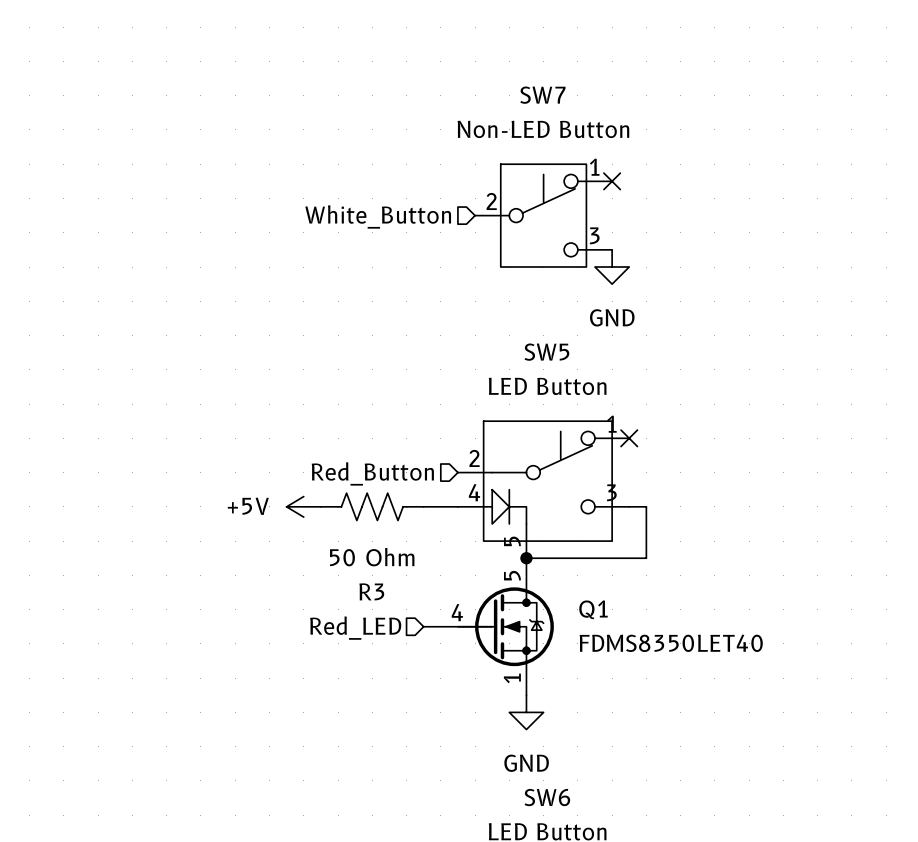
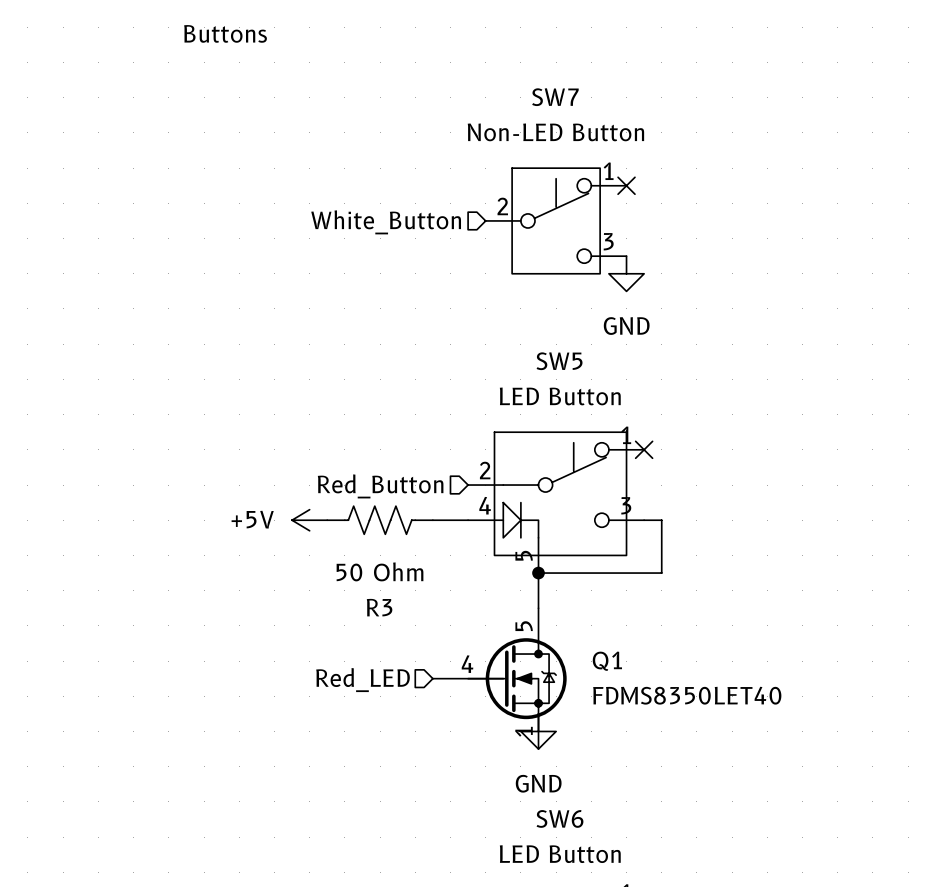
text: none -> Buttons (225, 33)
Q1 position: (488, 626) -> (499, 678)
hierarchical label position: Red_LED (355, 628) -> Red_LED (363, 680)

